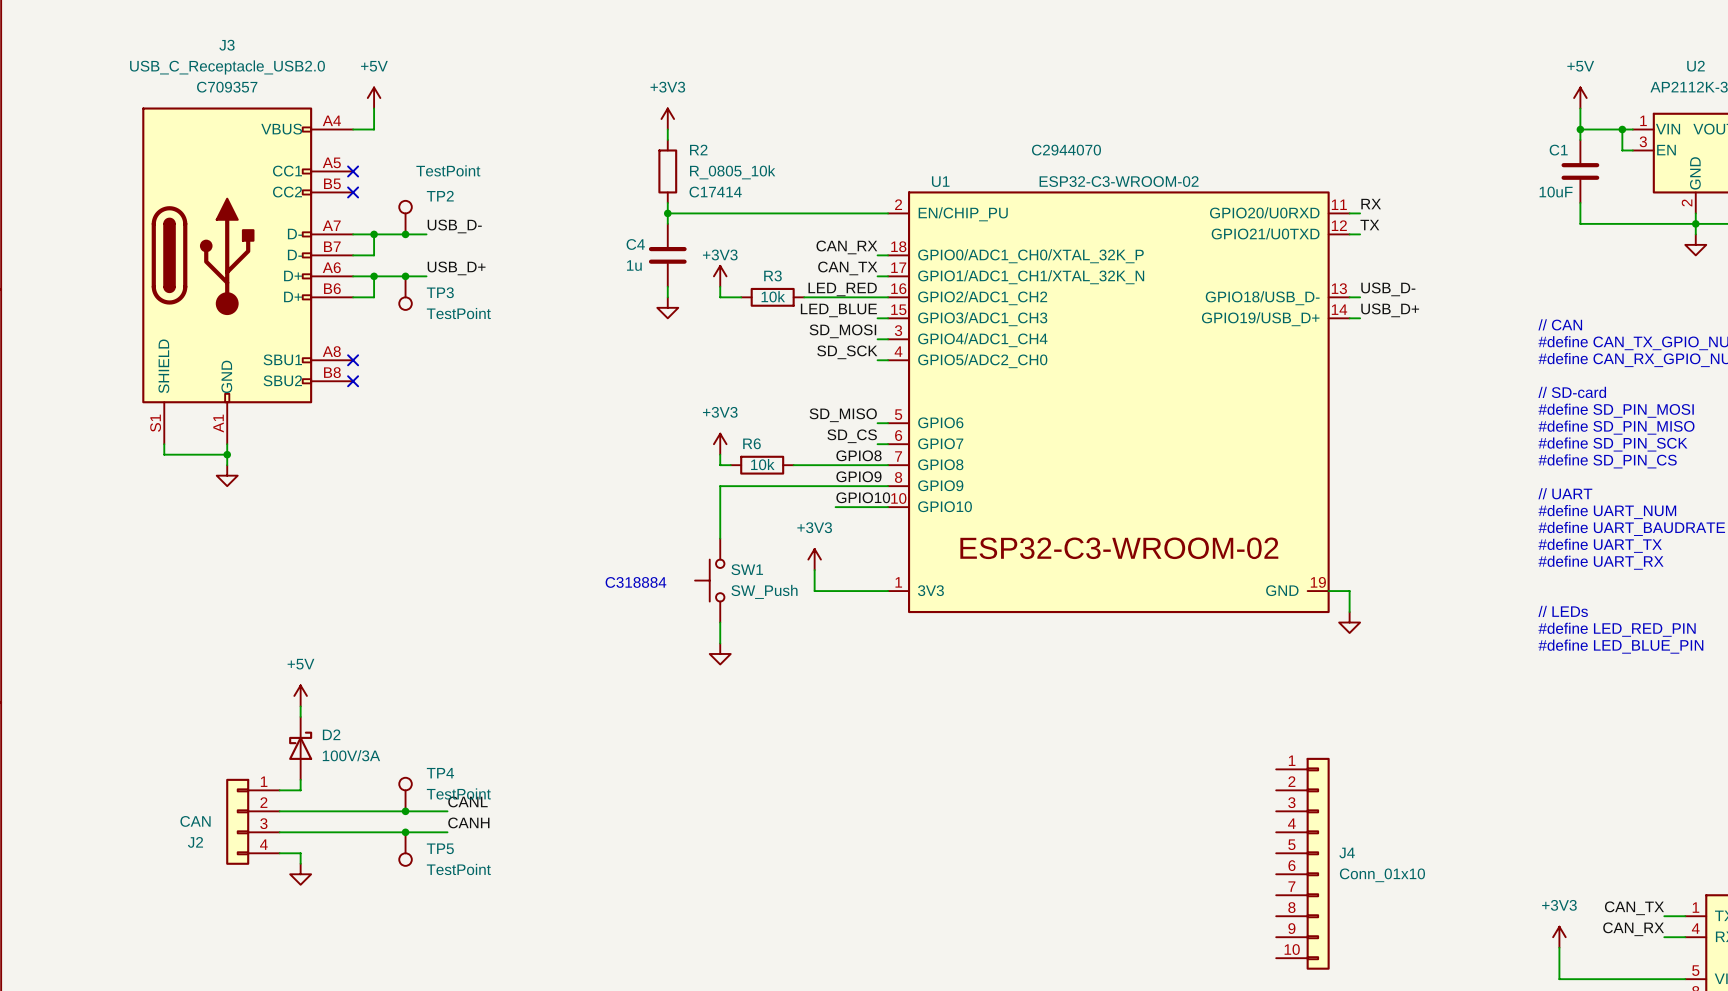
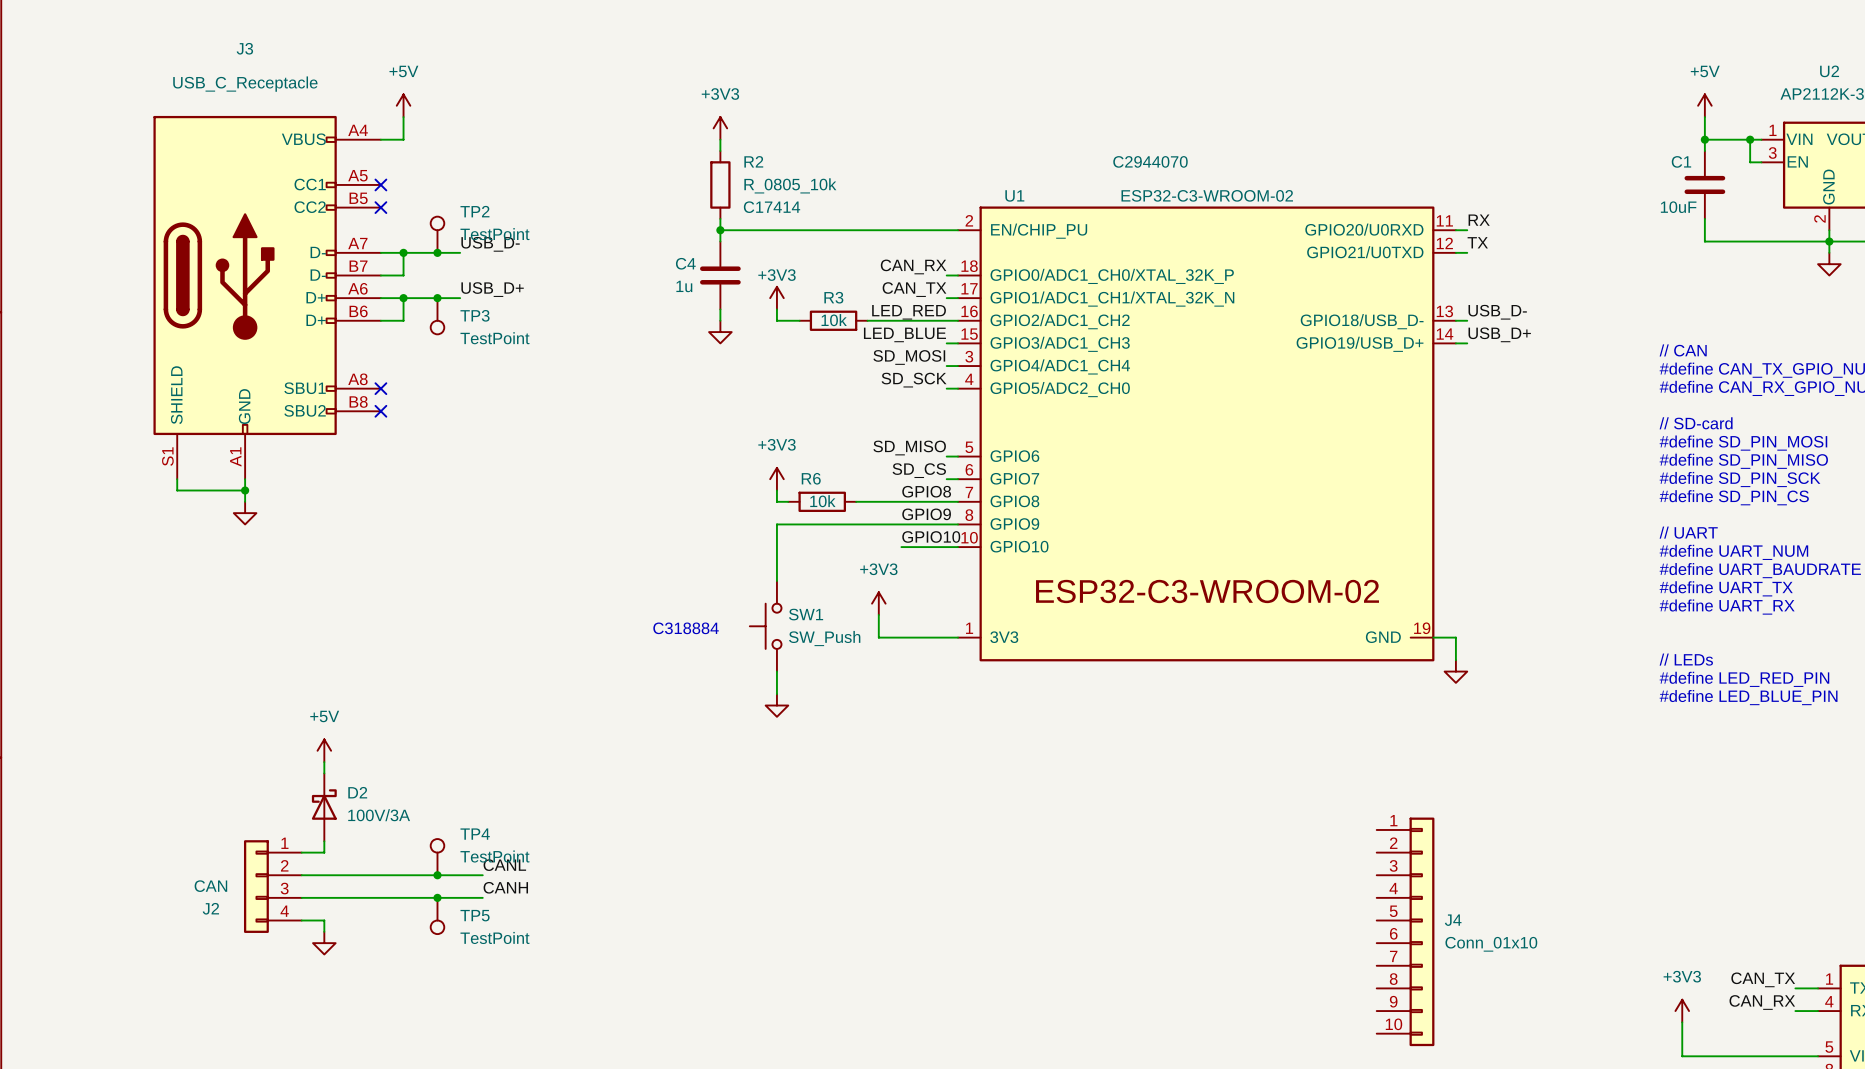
J3 value: USB_C_Receptacle_USB2.0 (227, 67) -> USB_C_Receptacle (245, 84)
J3 text: C709357 (227, 87) -> none
TP2 value position: TestPoint (448, 170) -> TestPoint (494, 234)

